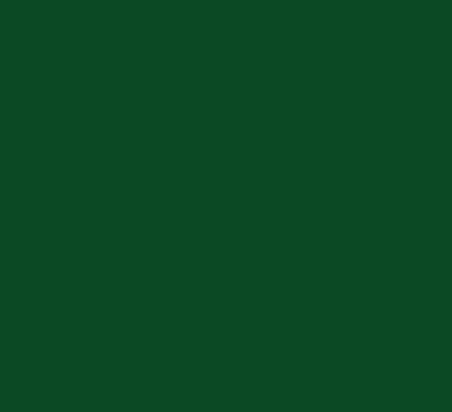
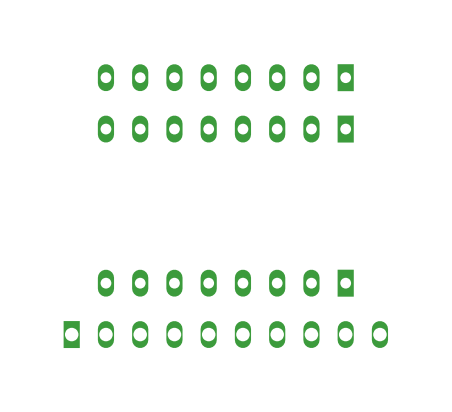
part: none -> (225, 77)
part: none -> (225, 129)
part: none -> (225, 283)
part: none -> (225, 334)

